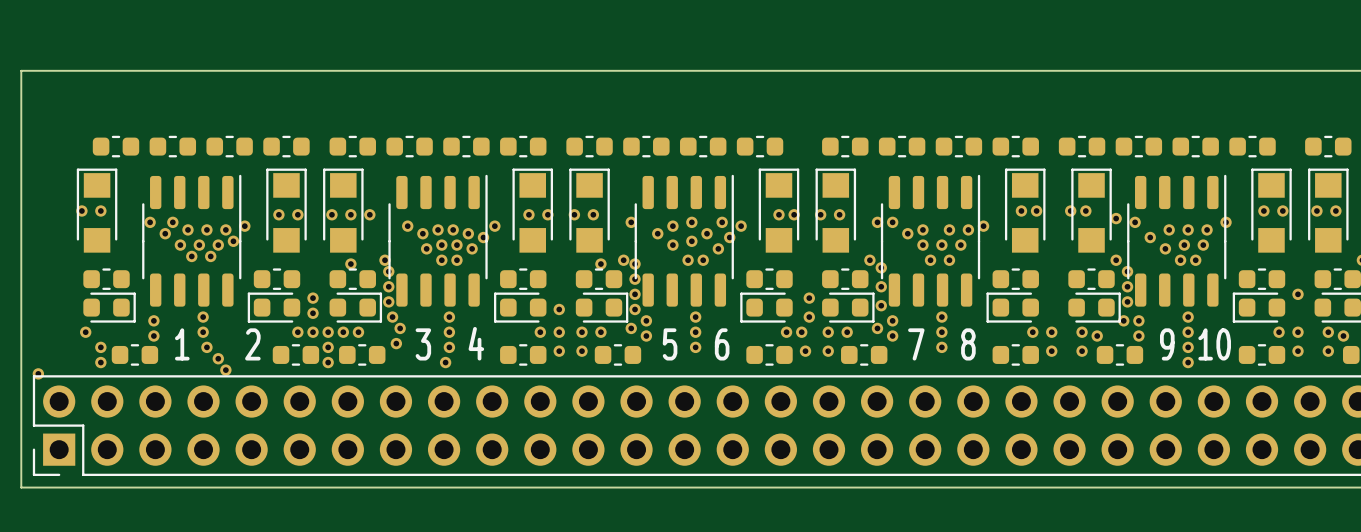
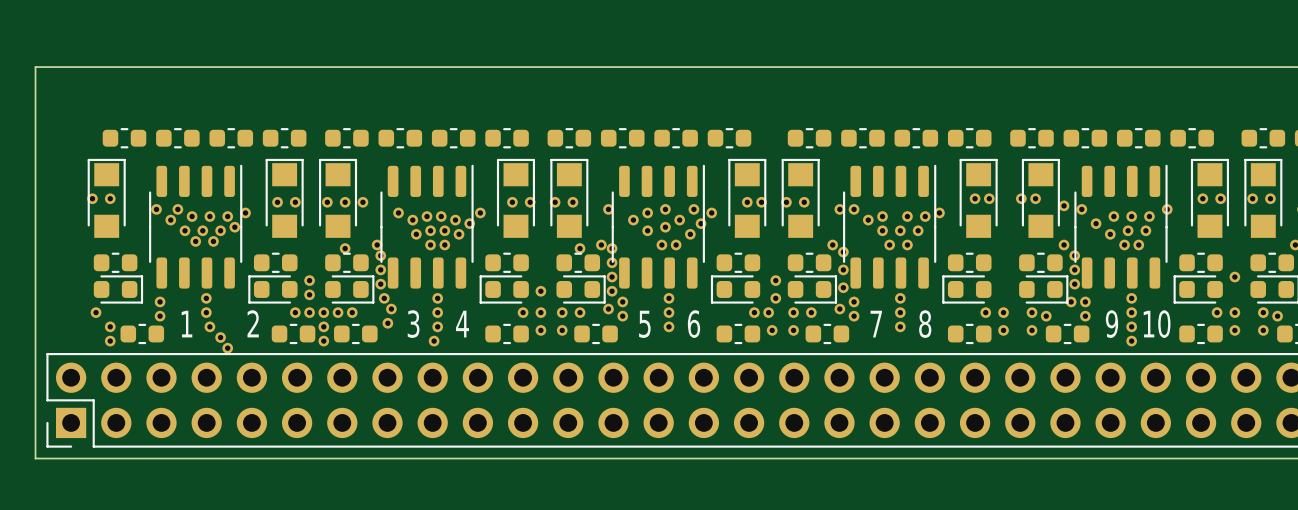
part: (38, 373) -> none

